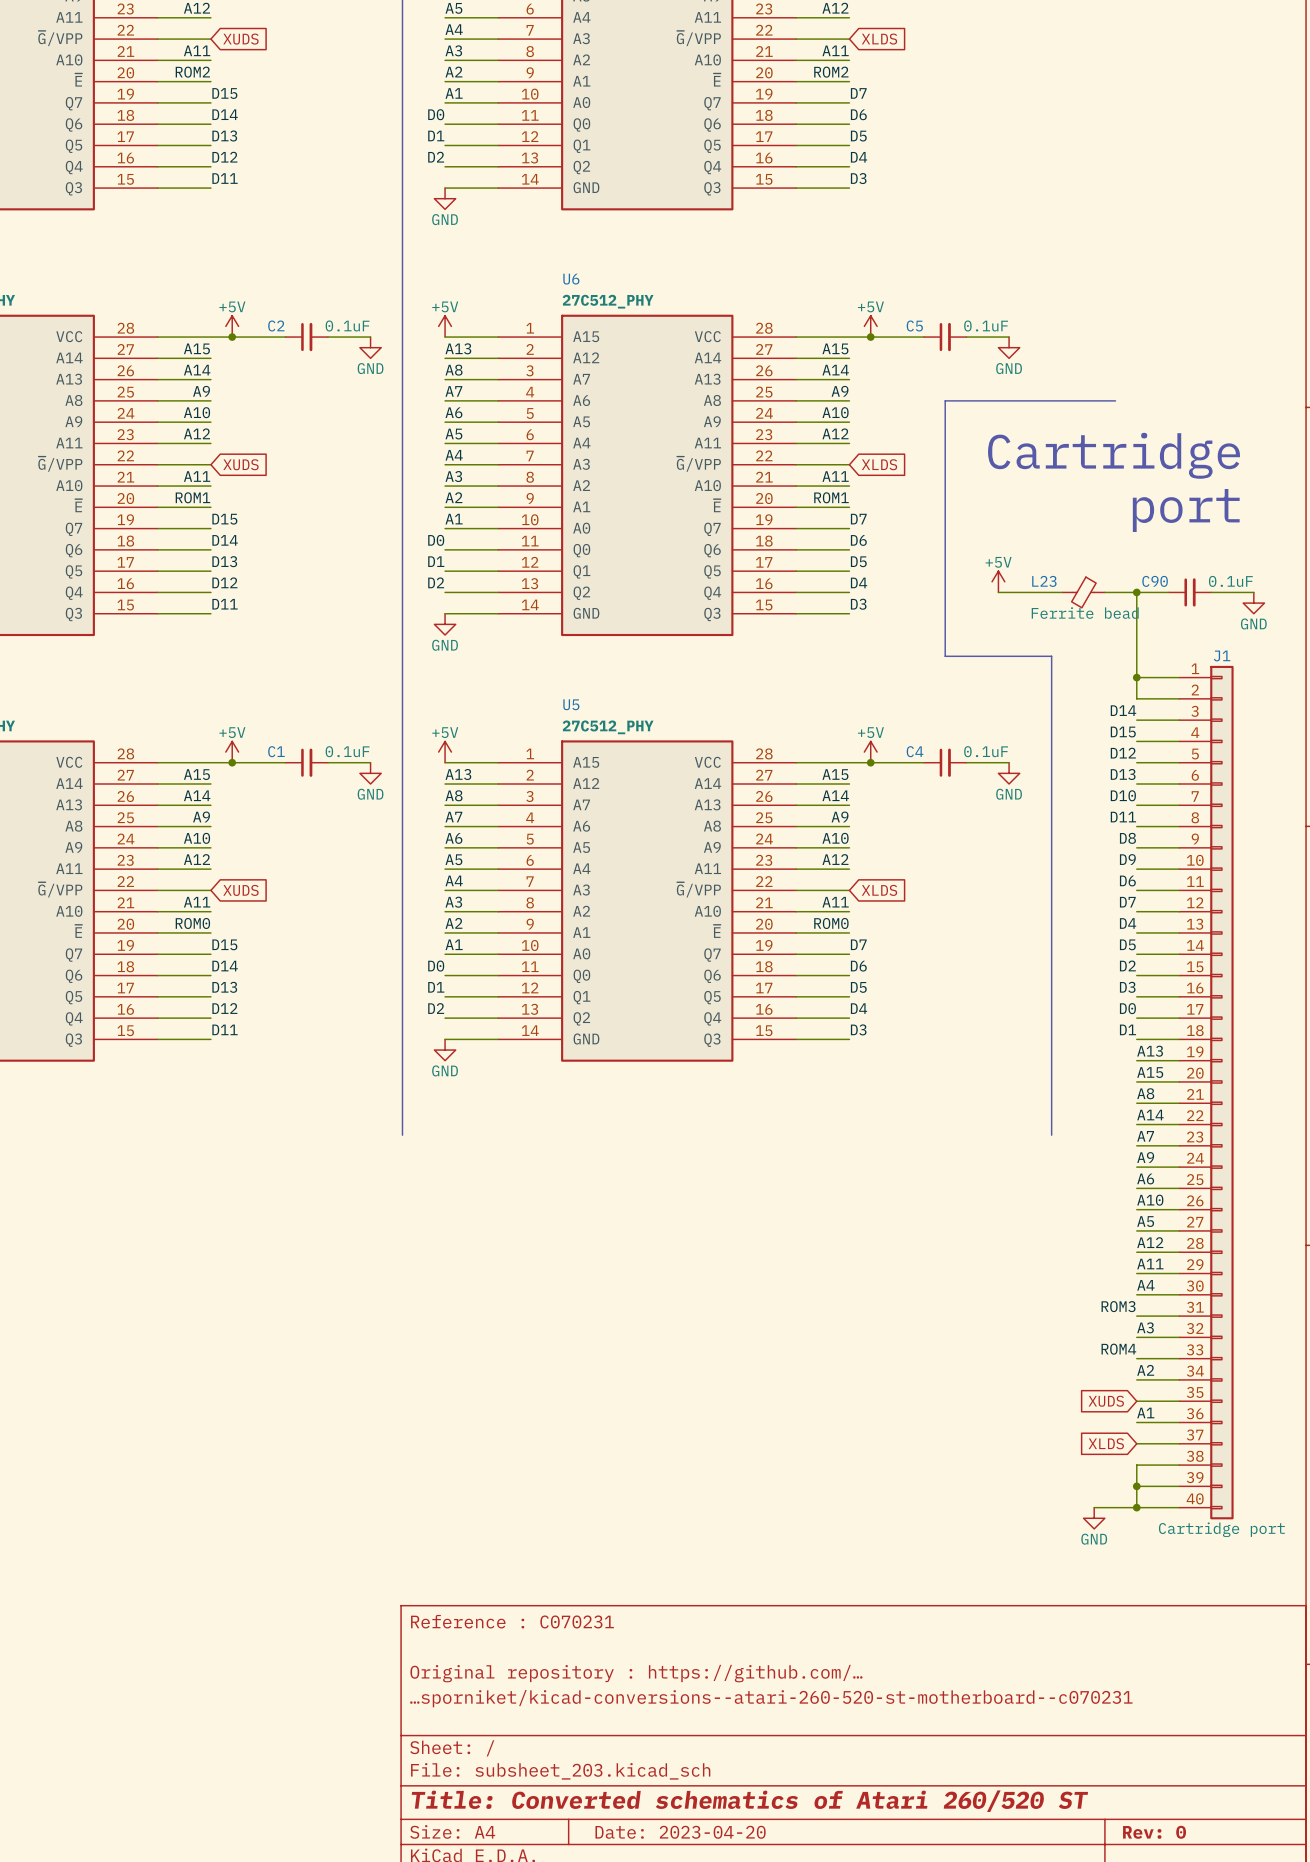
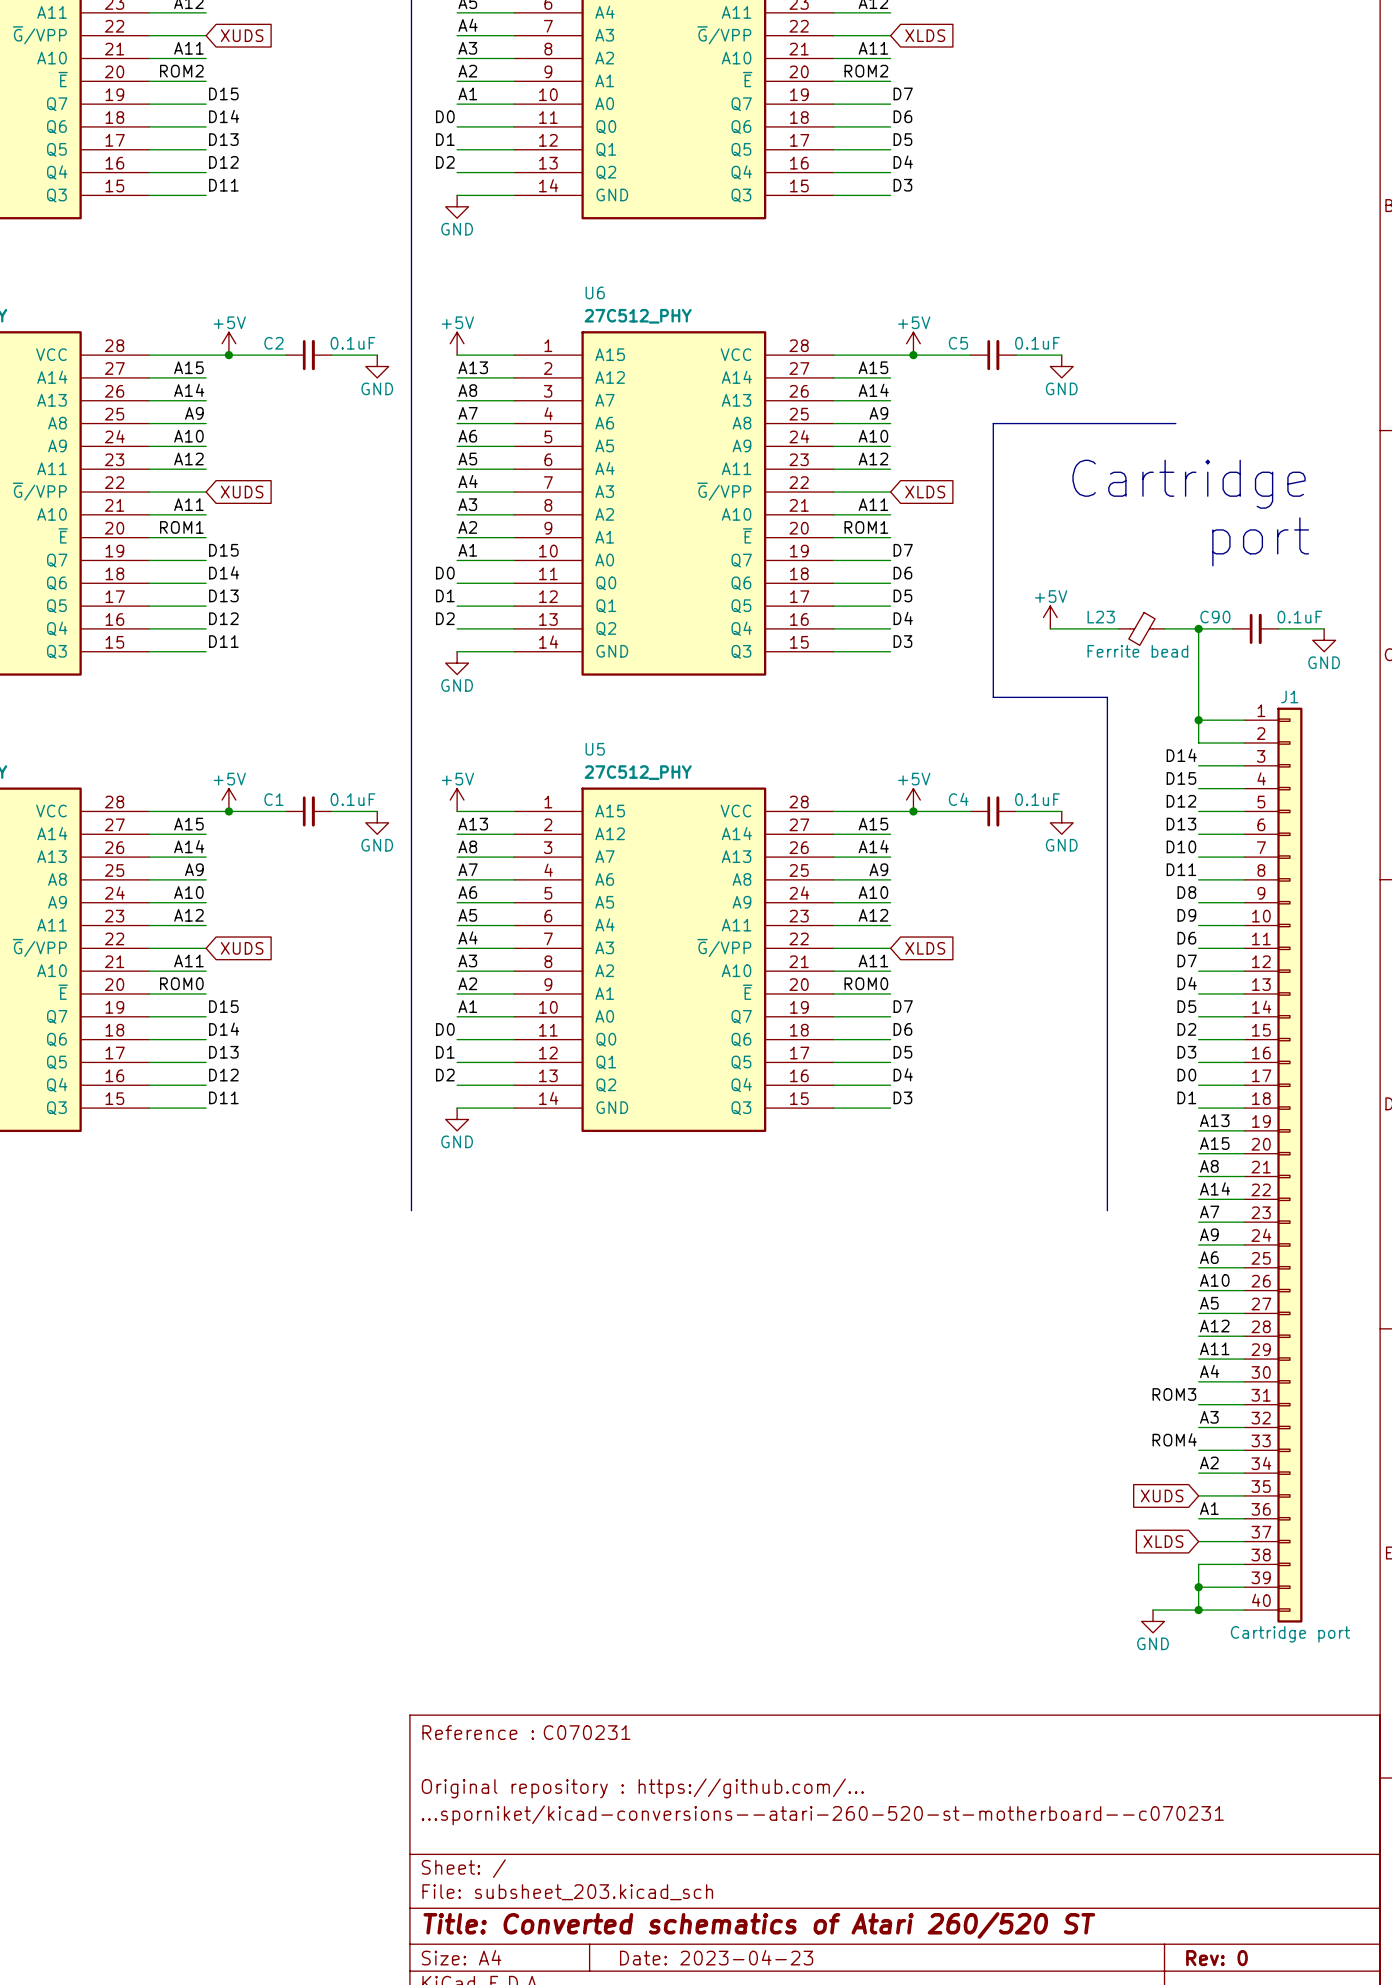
title block: Date: 2023-04-20 (680, 1832) -> Date: 2023-04-23 (716, 1957)

